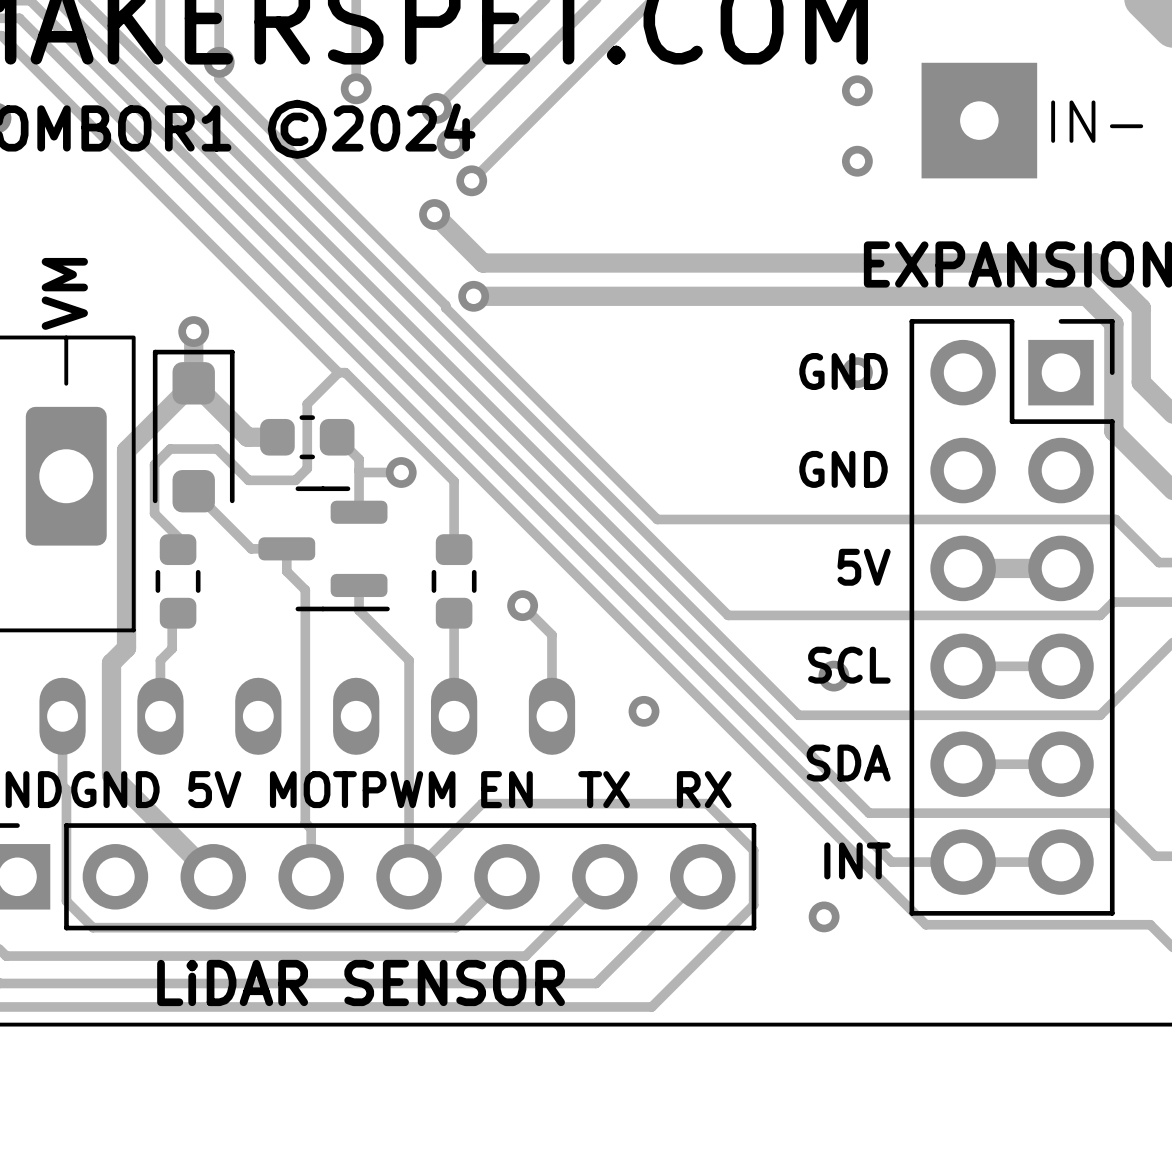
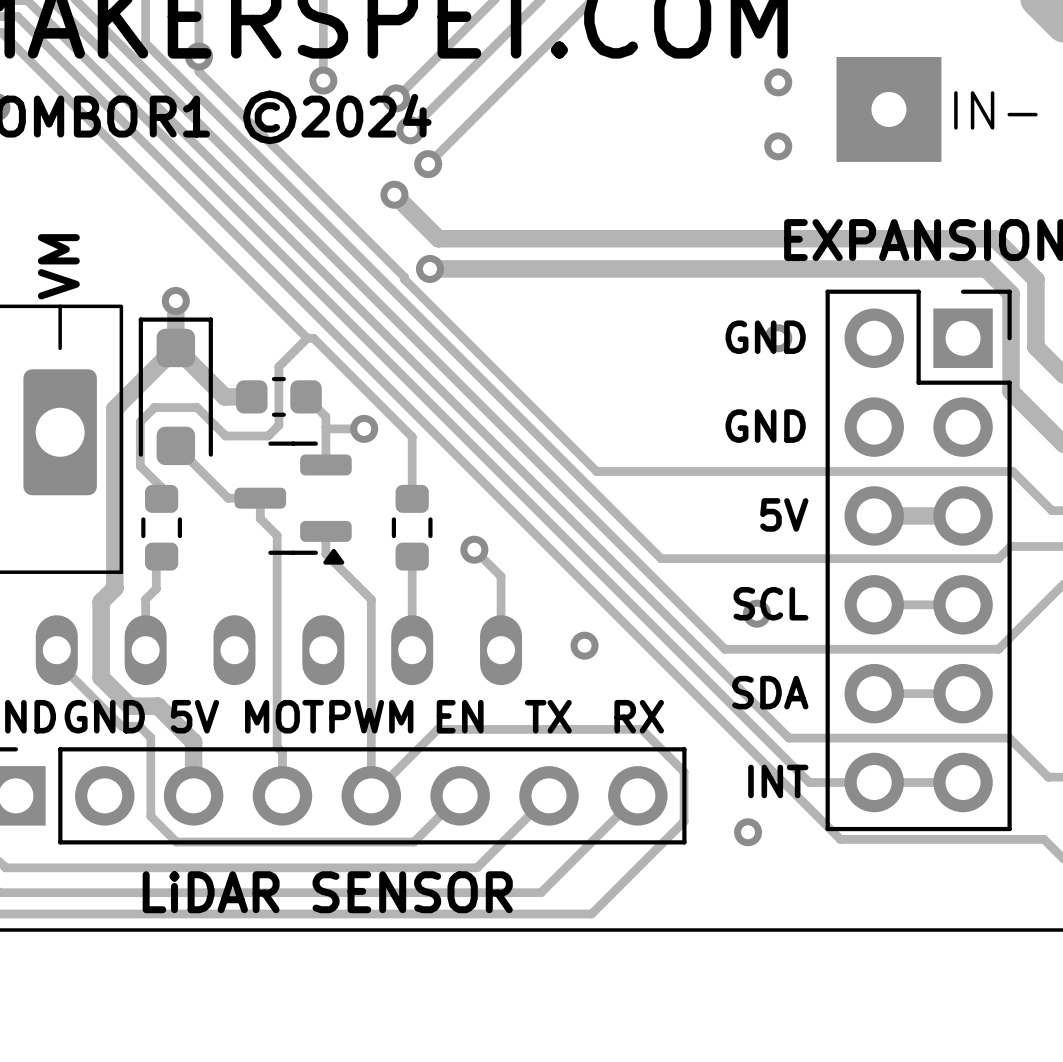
part footprint: [258, 486, 390, 612] -> [234, 441, 352, 565]
track: (62, 728) (62, 785) (66, 789) (66, 901) (92, 927) (194, 927) -> (56, 661) (121, 726) (139, 726) (150, 737) (150, 816) (176, 842)
track: (111, 746) (111, 774) (213, 876) -> (101, 677) (129, 706) (157, 706) (193, 741) (193, 795)

